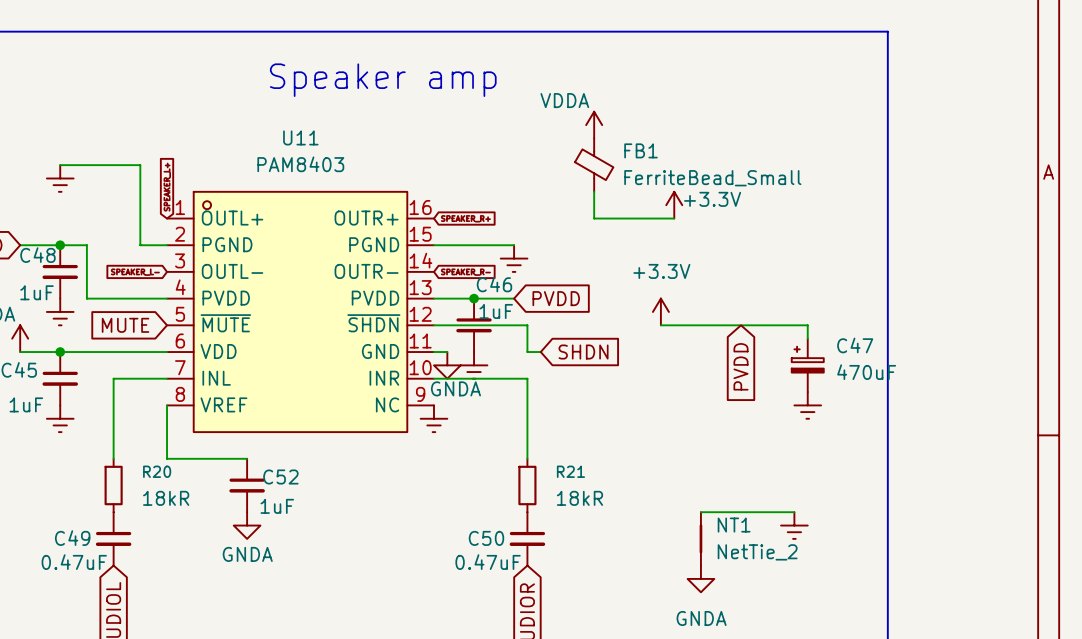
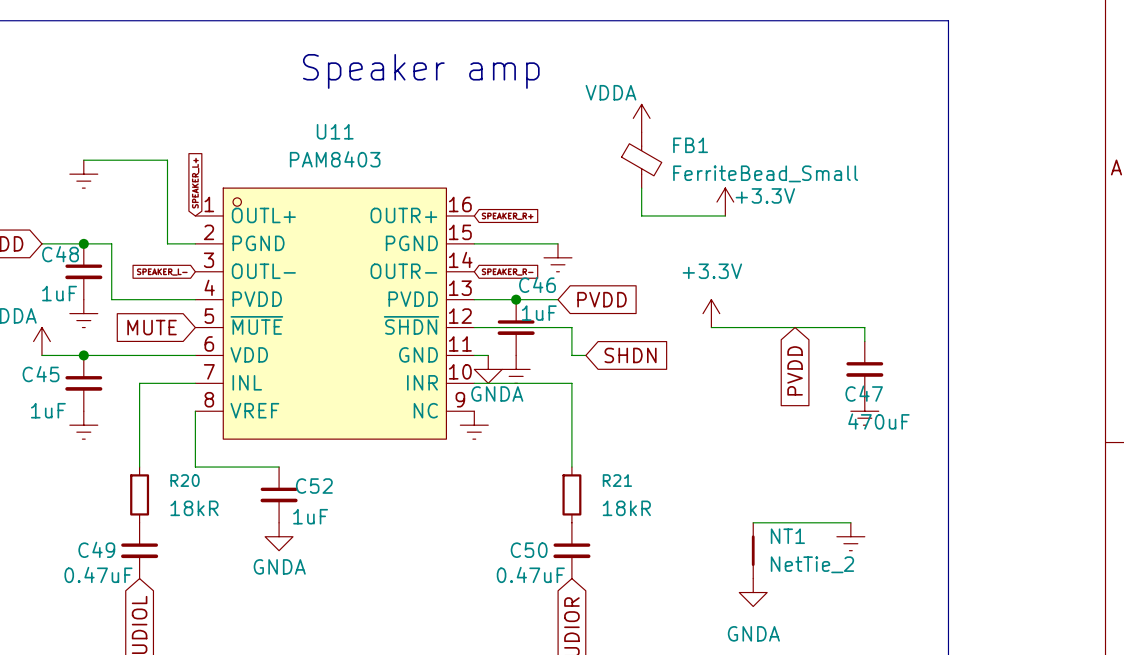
C47 symbol: [791, 338, 824, 393] -> [846, 341, 884, 398]
C47 name position: C47 (855, 345) -> C47 (864, 393)
C47 value position: 470uF (866, 372) -> 470uF (878, 421)

